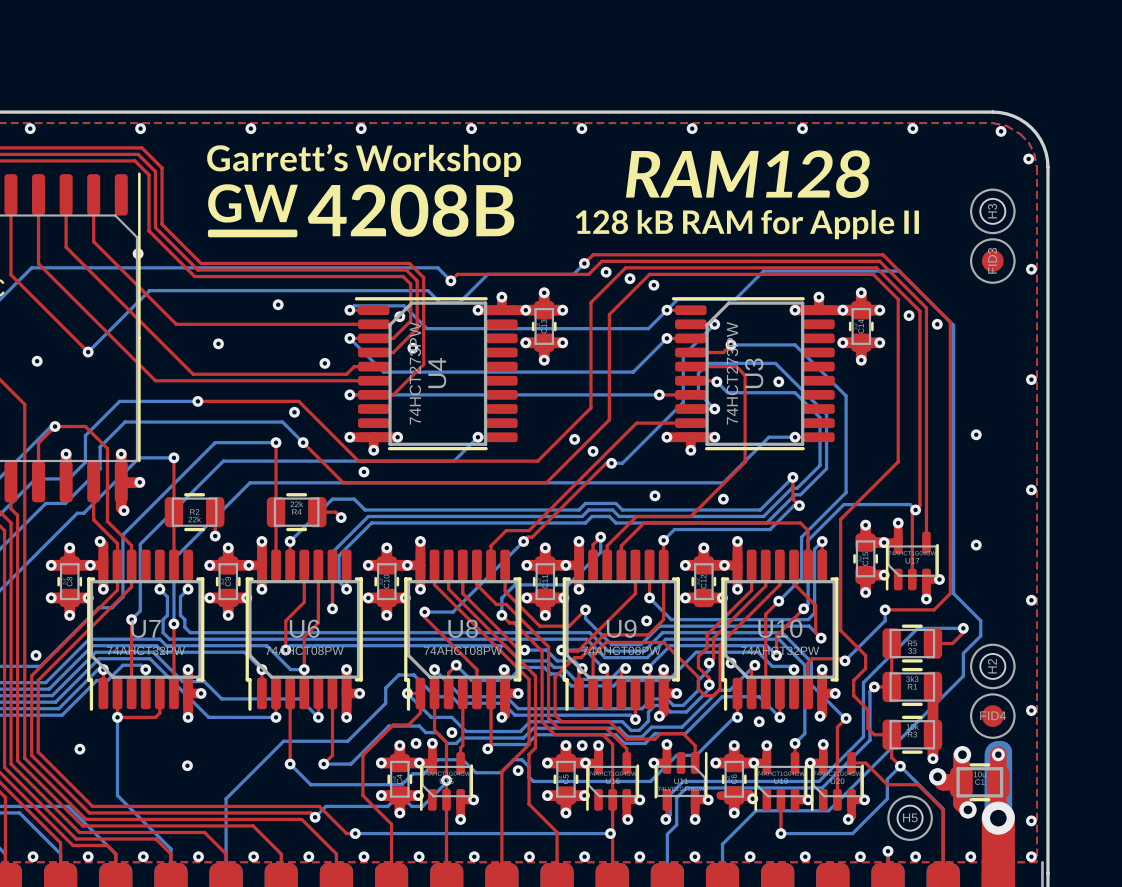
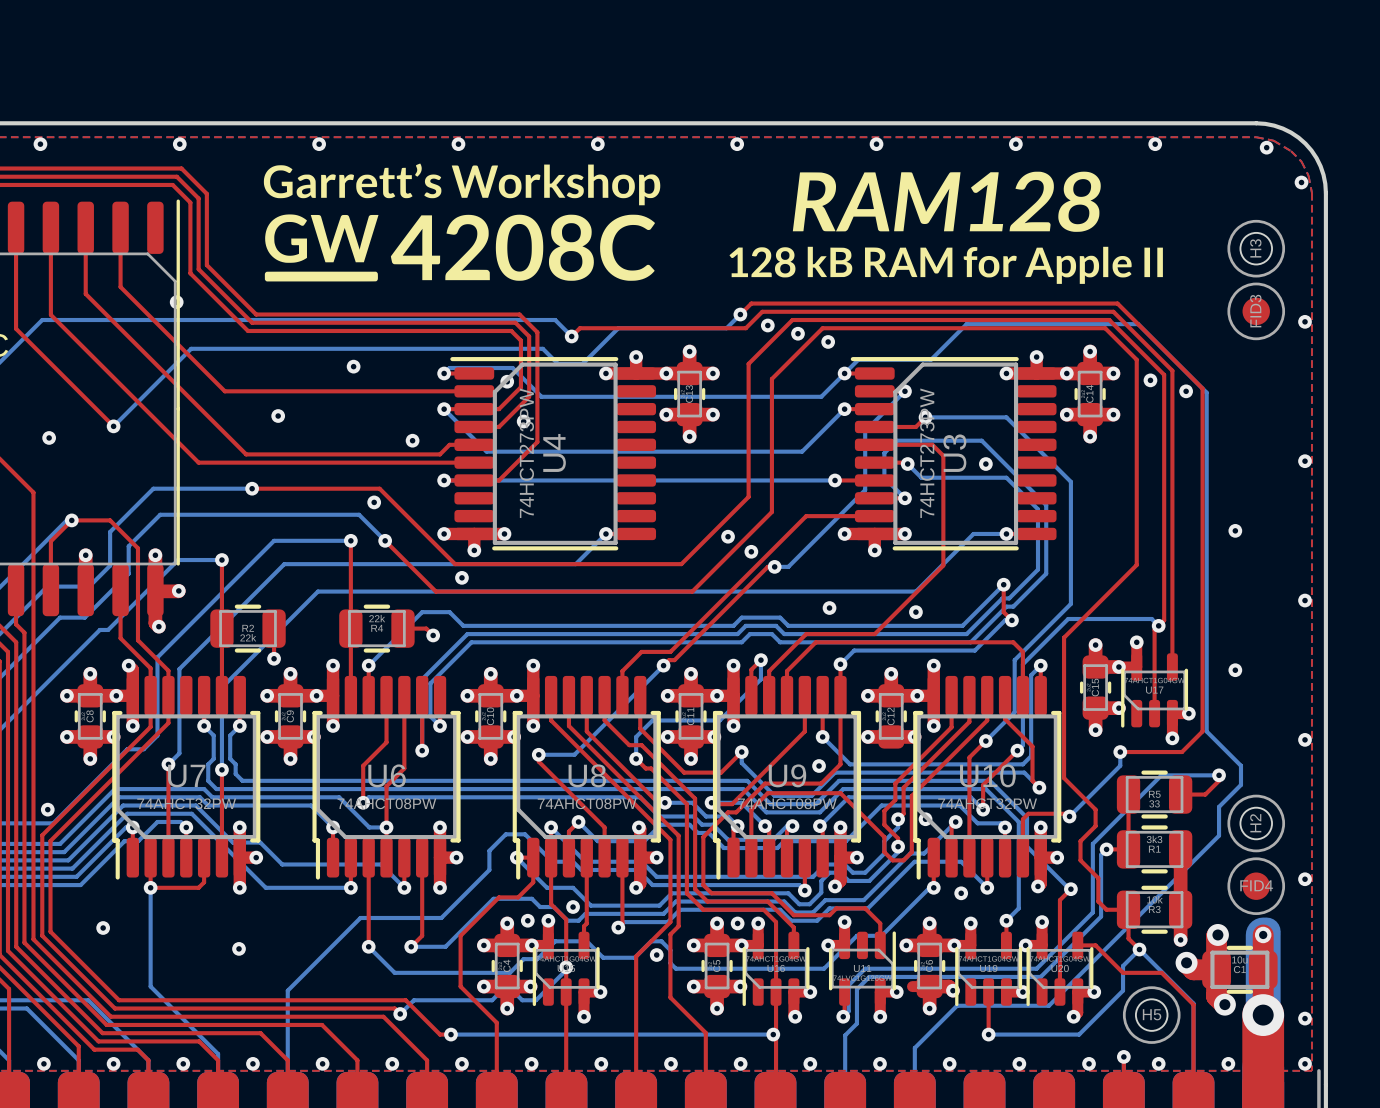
drawing shape: [207, 144, 521, 238] -> [263, 163, 661, 282]

